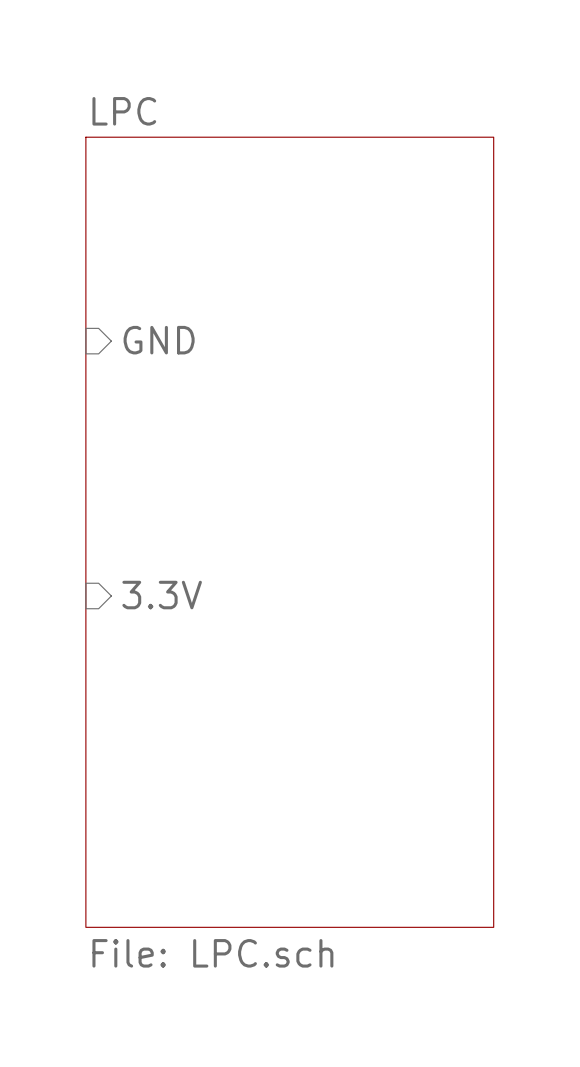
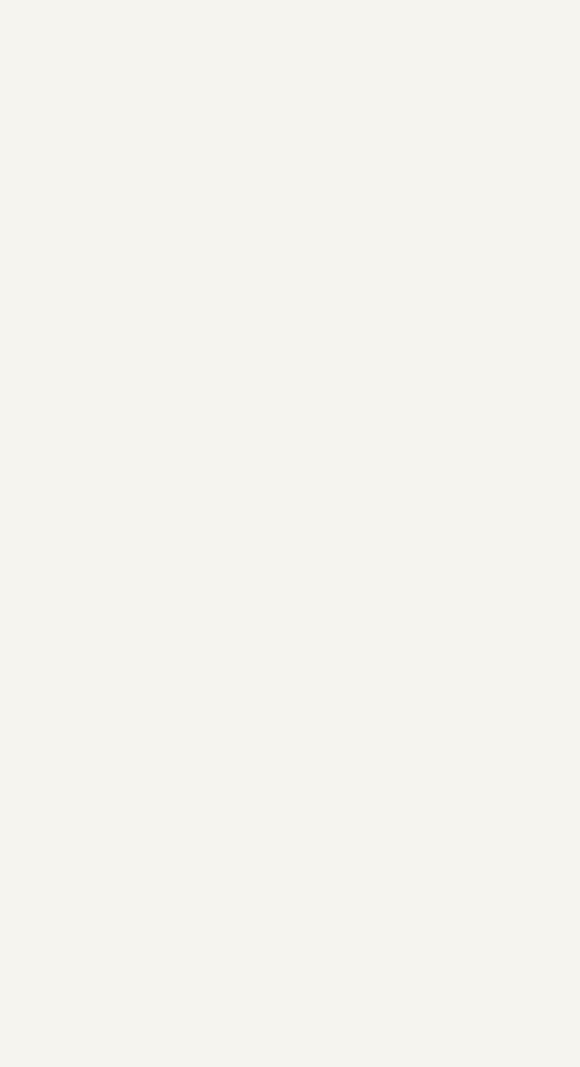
sheet pin: GND (159, 340) -> none
sheet LPC: File: LPC.sch (289, 532) -> none
sheet pin: 3.3V (162, 595) -> none

